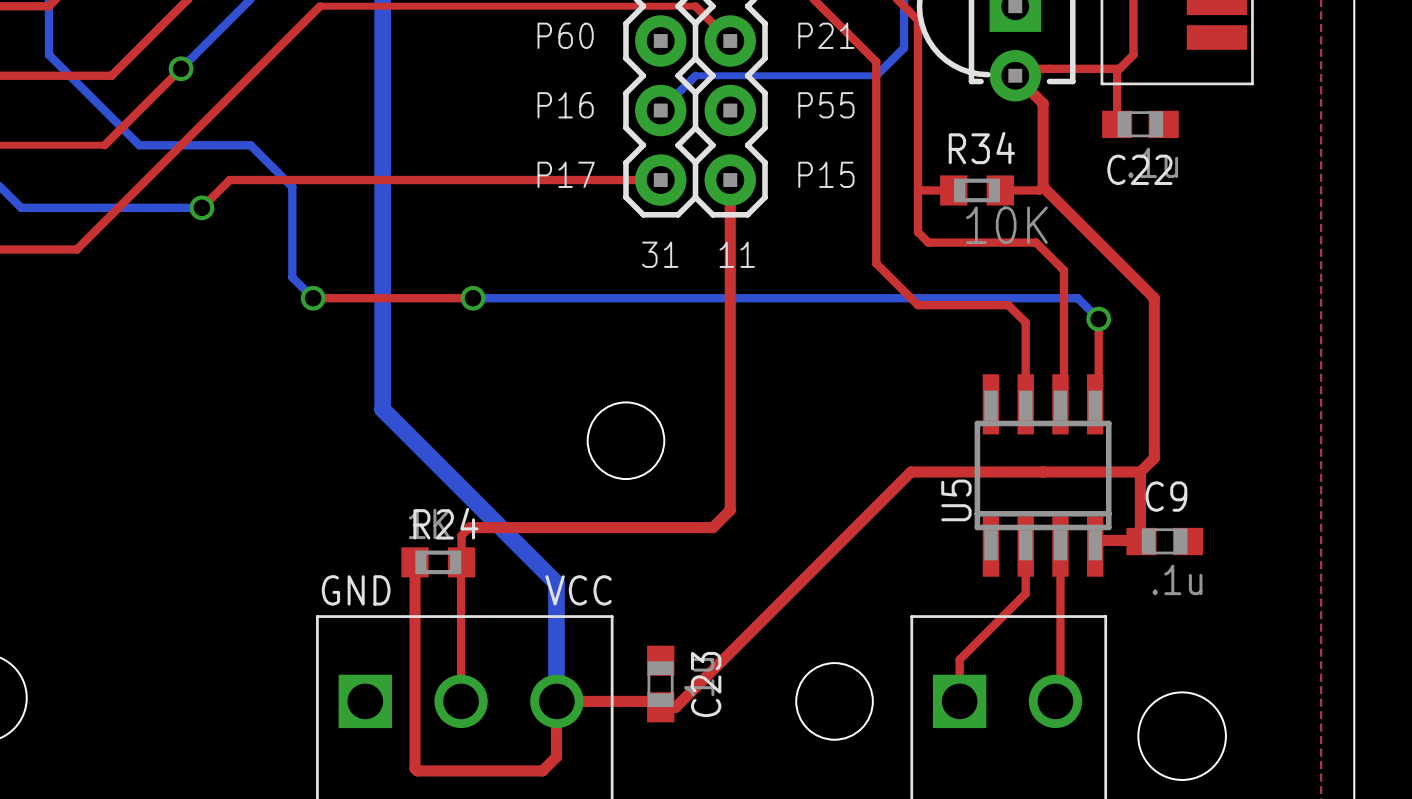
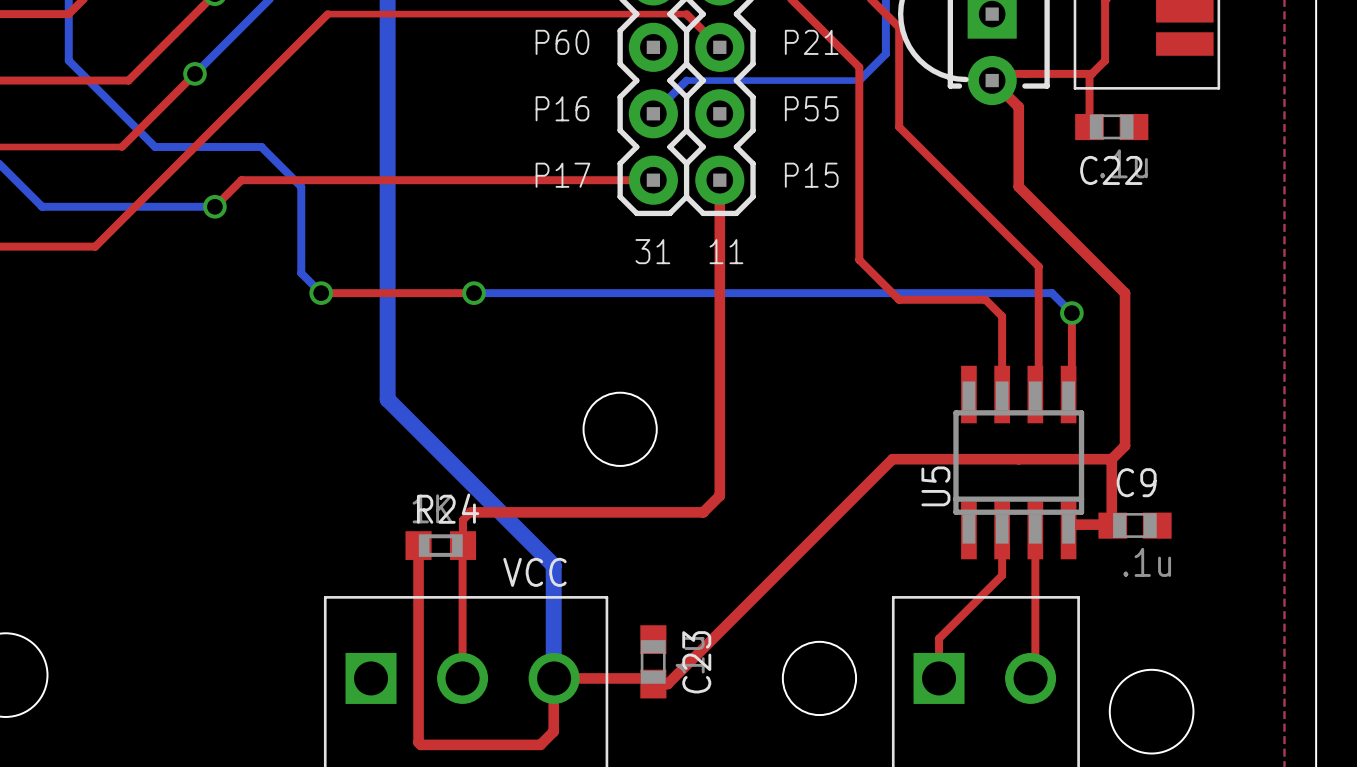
top track: (917, 124) (917, 232) (928, 242) (1036, 242) -> (899, 127) (1012, 239)
top track: (1043, 186) (1039, 190) (1000, 190) -> none
top track: (917, 190) (953, 190) -> none
R34: 10K (977, 190) -> none
text: GND (356, 590) -> none
text position: VCC (578, 590) -> VCC (534, 572)

